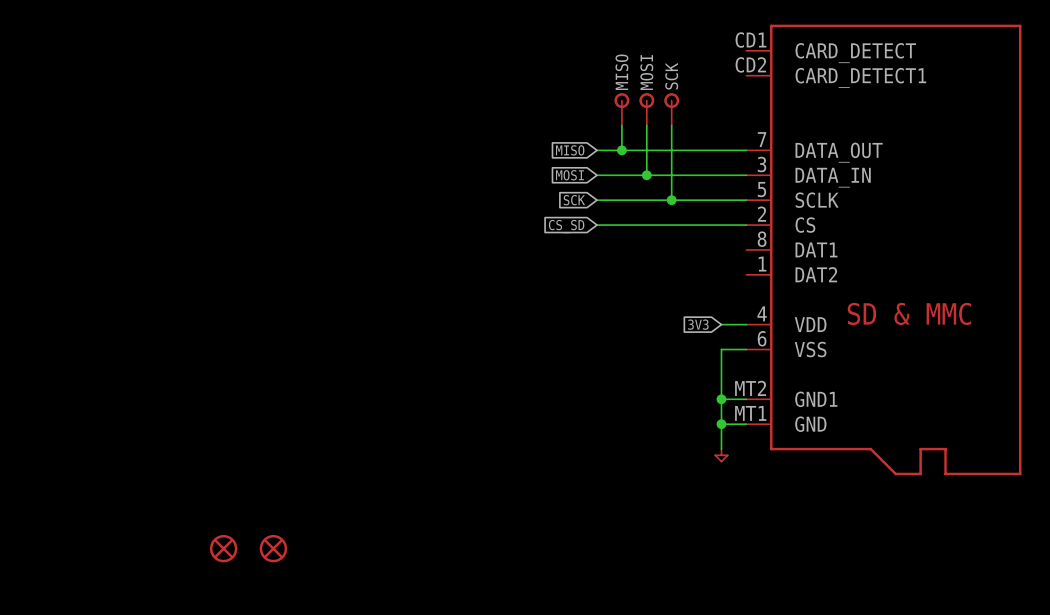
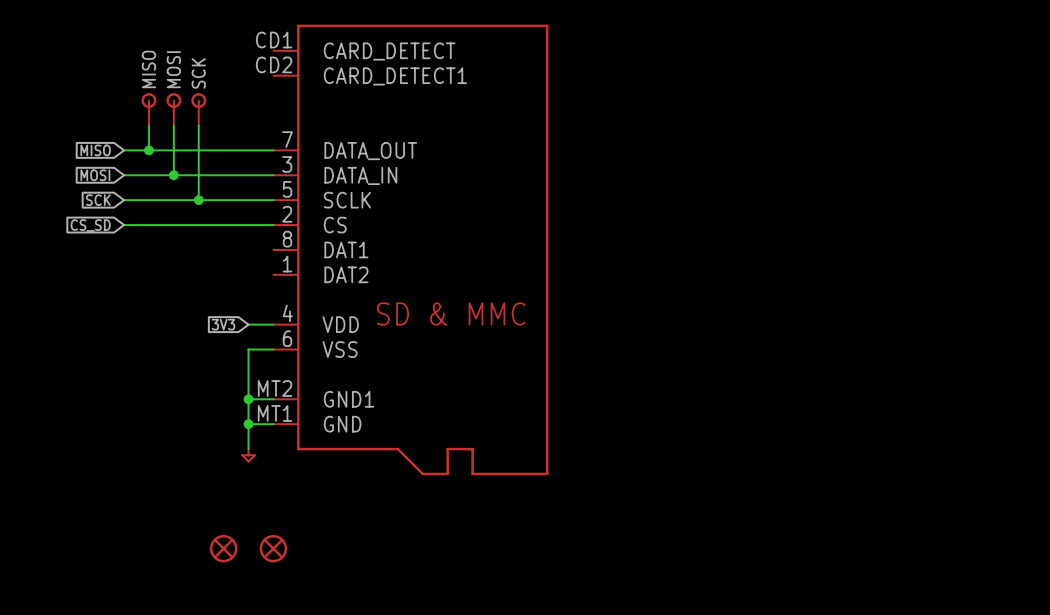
MISO: none -> (148, 109)
MOSI: none -> (173, 109)
SCK: none -> (198, 109)
MISO: (621, 109) -> none
MOSI: (646, 109) -> none
SCK: (671, 109) -> none
wire: none -> (148, 125) (148, 150)
wire: none -> (173, 125) (173, 175)
wire: none -> (198, 125) (198, 200)
wire: (621, 125) (621, 150) -> none
wire: (646, 125) (646, 175) -> none
wire: (671, 125) (671, 200) -> none
global label: none -> MISO (95, 150)
wire: none -> (124, 150) (273, 150)
junction: none -> (148, 150)
global label: MISO (570, 150) -> none
wire: (597, 150) (746, 150) -> none
junction: (621, 150) -> none
global label: none -> MOSI (95, 175)
wire: none -> (124, 175) (273, 175)
junction: none -> (173, 175)
global label: MOSI (569, 175) -> none
wire: (597, 175) (746, 175) -> none
junction: (646, 175) -> none
global label: none -> SCK (98, 200)
wire: none -> (124, 200) (273, 200)
junction: none -> (198, 200)
global label: SCK (574, 200) -> none
wire: (597, 200) (746, 200) -> none
junction: (671, 200) -> none
wire: none -> (124, 225) (273, 225)
wire: (597, 225) (746, 225) -> none
global label: none -> CS_SD (90, 225)
global label: CS_SD (566, 226) -> none
part: none -> (410, 249)
part: (883, 249) -> none
global label: none -> 3V3 (223, 324)
wire: none -> (248, 324) (273, 324)
global label: 3V3 (698, 324) -> none
wire: (721, 324) (746, 324) -> none
wire: none -> (273, 349) (248, 349) (248, 449)
wire: (746, 349) (721, 349) (721, 449) -> none
wire: none -> (248, 399) (273, 399)
junction: none -> (248, 399)
wire: (721, 399) (746, 399) -> none
junction: (721, 399) -> none
wire: none -> (248, 424) (273, 424)
junction: none -> (248, 424)
wire: (721, 424) (746, 424) -> none
junction: (721, 424) -> none
power symbol: none -> (248, 455)
power symbol: (721, 455) -> none

